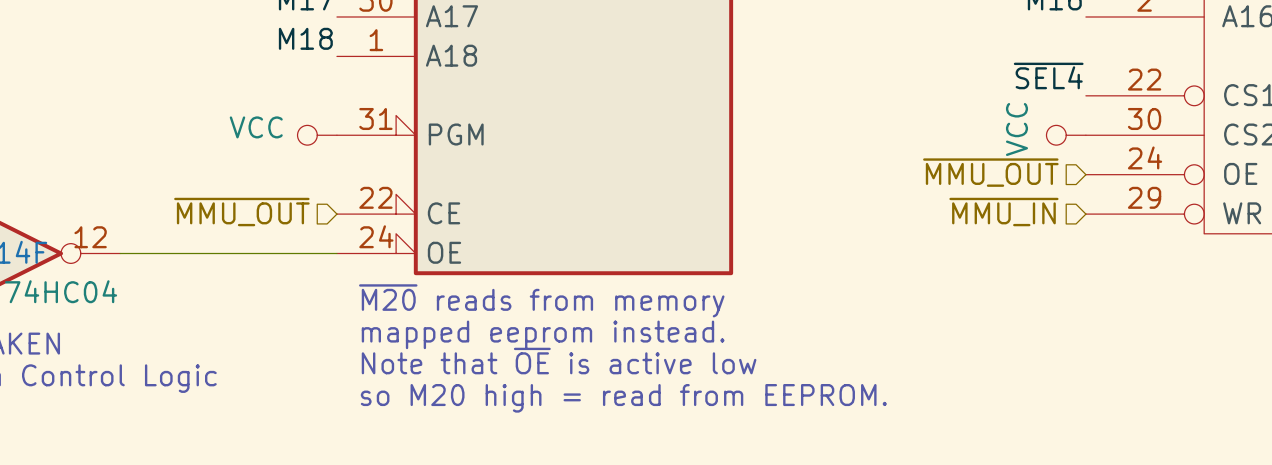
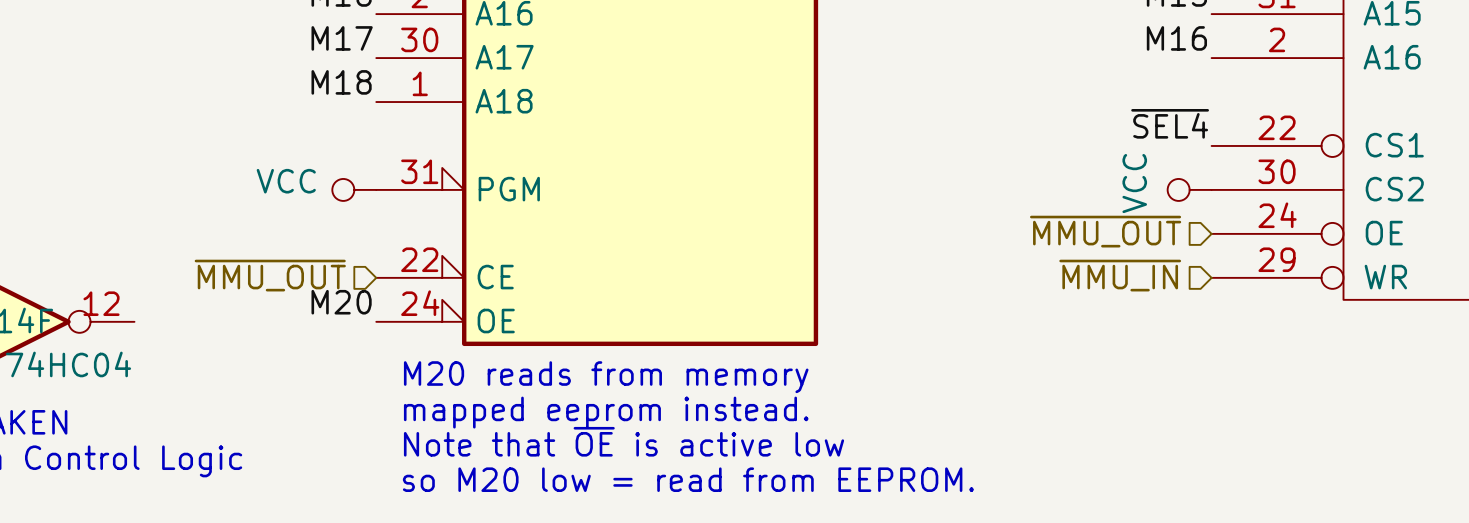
label: none -> M20 (341, 302)
wire: (120, 253) (336, 253) -> none
text: ~{M20} reads from memory (541, 300) -> M20 reads from memory (606, 377)
text: so M20 high = read from EEPROM. (623, 398) -> so M20 low = read from EEPROM. (688, 479)

